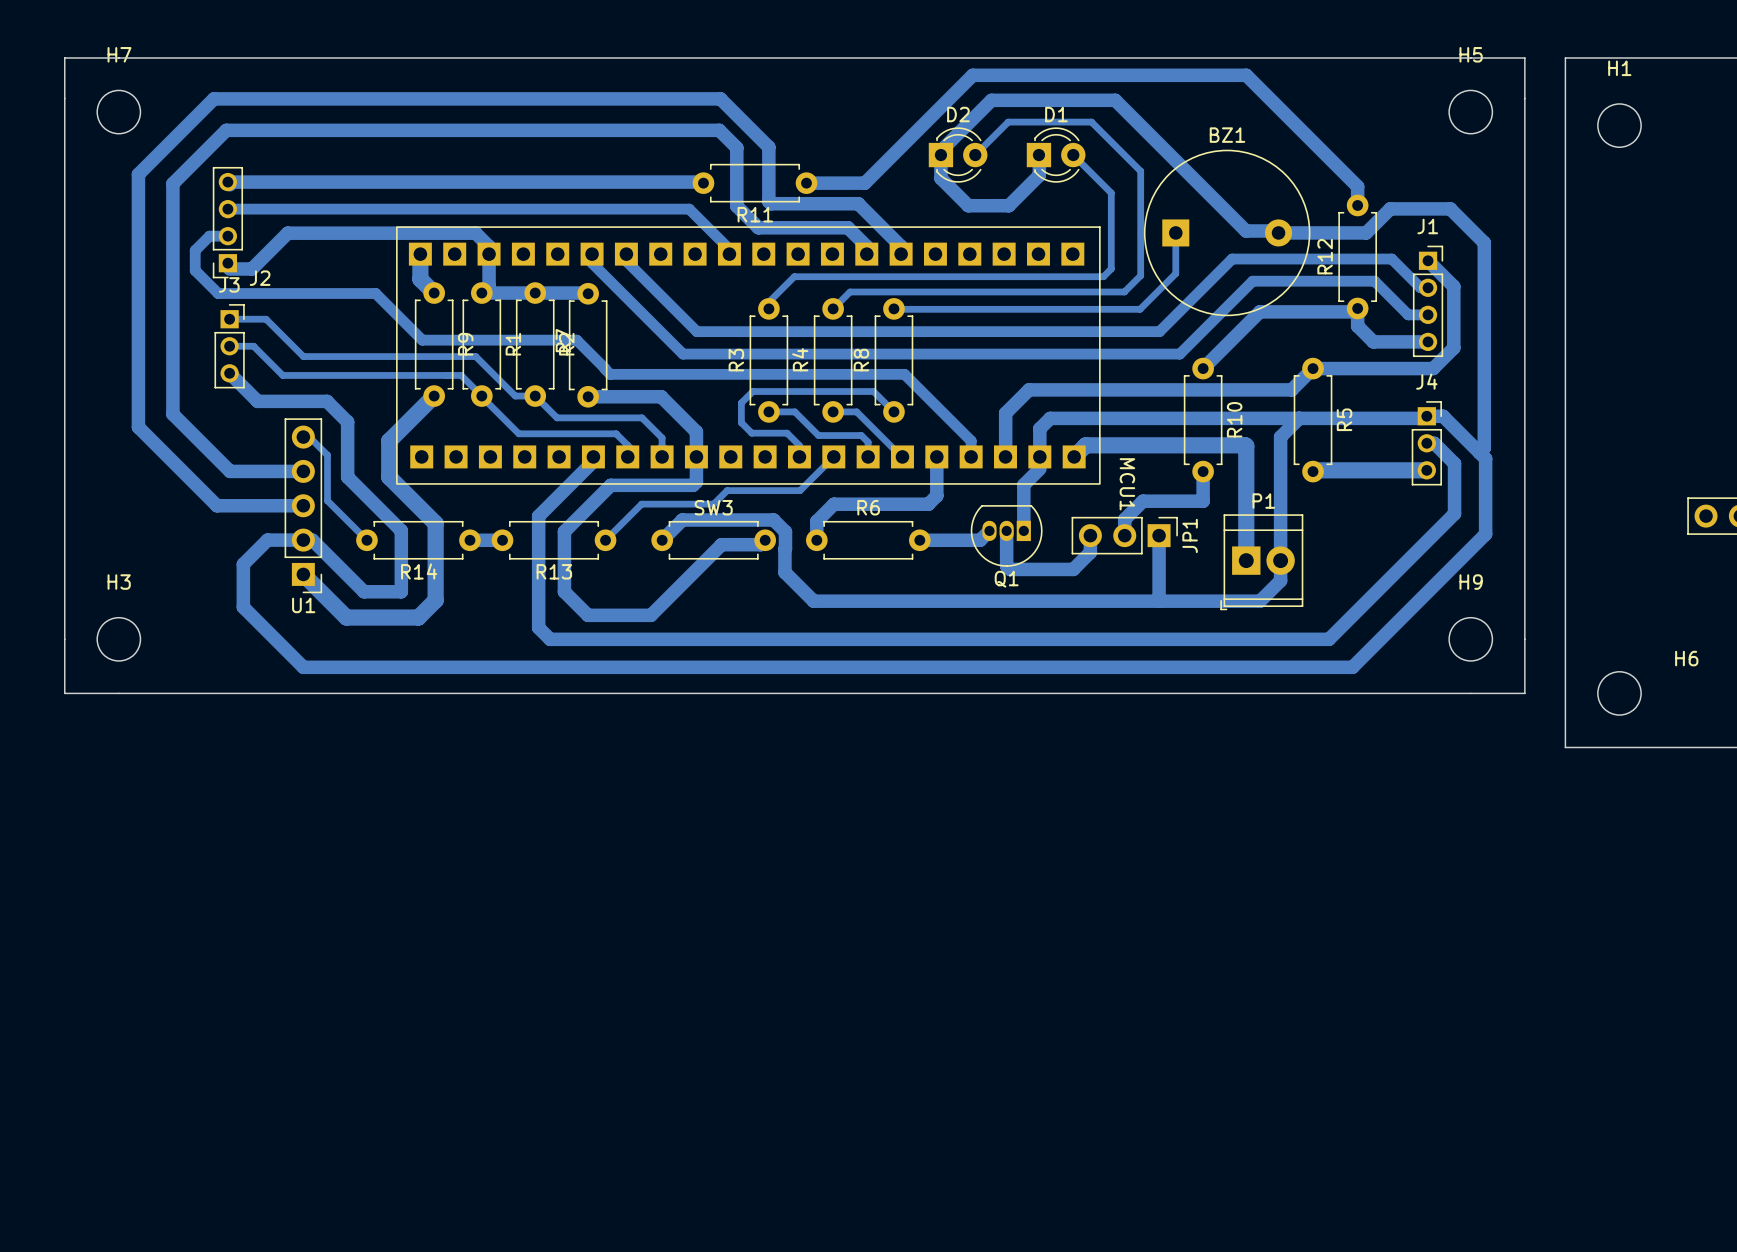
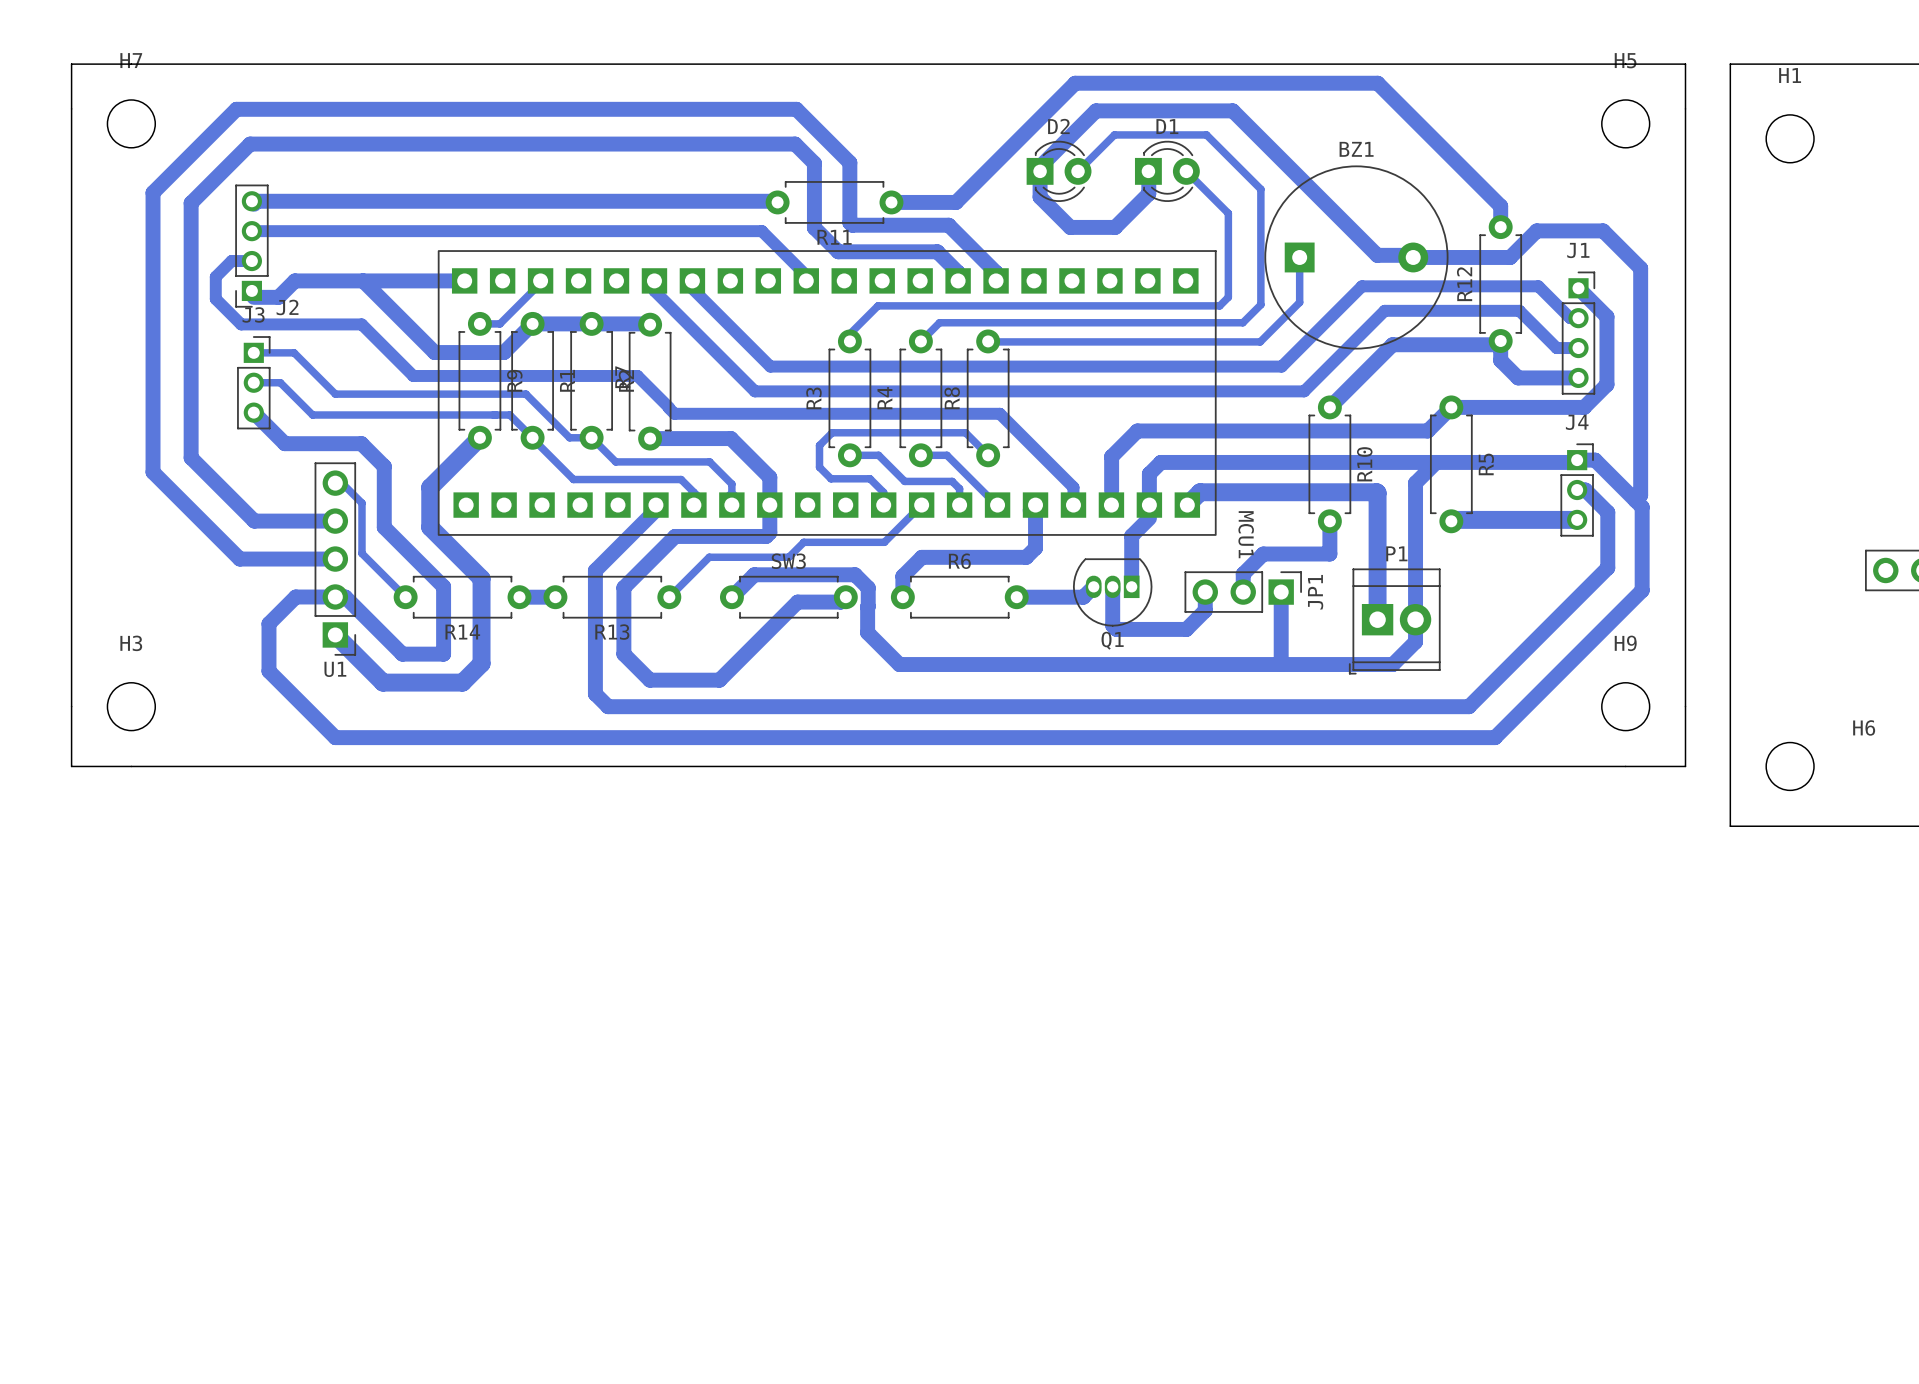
bottom track: (266, 254) (287, 233) (475, 233) (489, 246) (489, 254) -> (294, 280) (464, 280)
bottom track: none -> (363, 280) (434, 352) (503, 352) (532, 323)
bottom track: (420, 254) (420, 279) (434, 293) -> none
bottom track: (489, 256) (489, 285) (481, 293) -> (540, 283) (499, 323) (479, 323)
bottom track: (327, 293) (375, 293) (422, 340) -> (361, 324) (413, 375) (466, 375)

